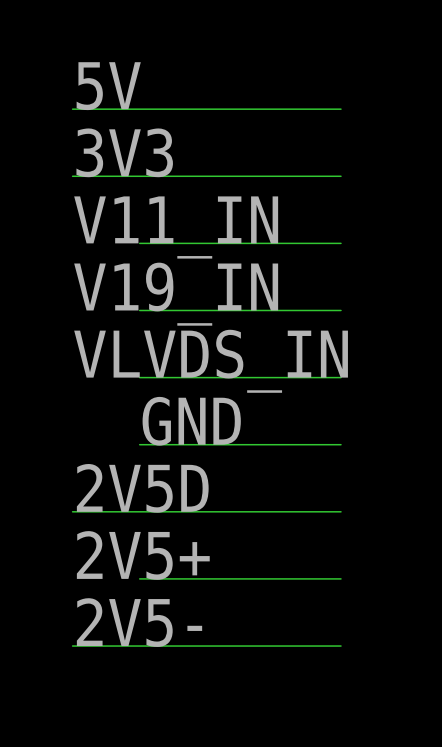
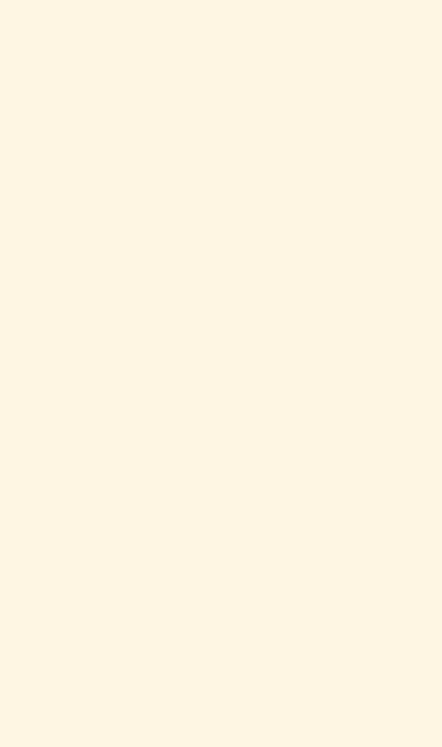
label: 5V (108, 86) -> none
wire: (72, 109) (341, 109) -> none
label: 3V3 (124, 152) -> none
wire: (72, 176) (341, 176) -> none
label: V11_IN (176, 227) -> none
wire: (139, 243) (341, 243) -> none
label: V19_IN (176, 294) -> none
wire: (139, 310) (341, 310) -> none
label: VLVDS_IN (211, 361) -> none
wire: (139, 377) (341, 377) -> none
label: GND (191, 421) -> none
wire: (139, 444) (341, 444) -> none
label: 2V5D (142, 488) -> none
wire: (72, 511) (341, 511) -> none
label: 2V5+ (143, 555) -> none
wire: (139, 578) (341, 578) -> none
label: 2V5- (139, 622) -> none
wire: (72, 646) (341, 646) -> none

